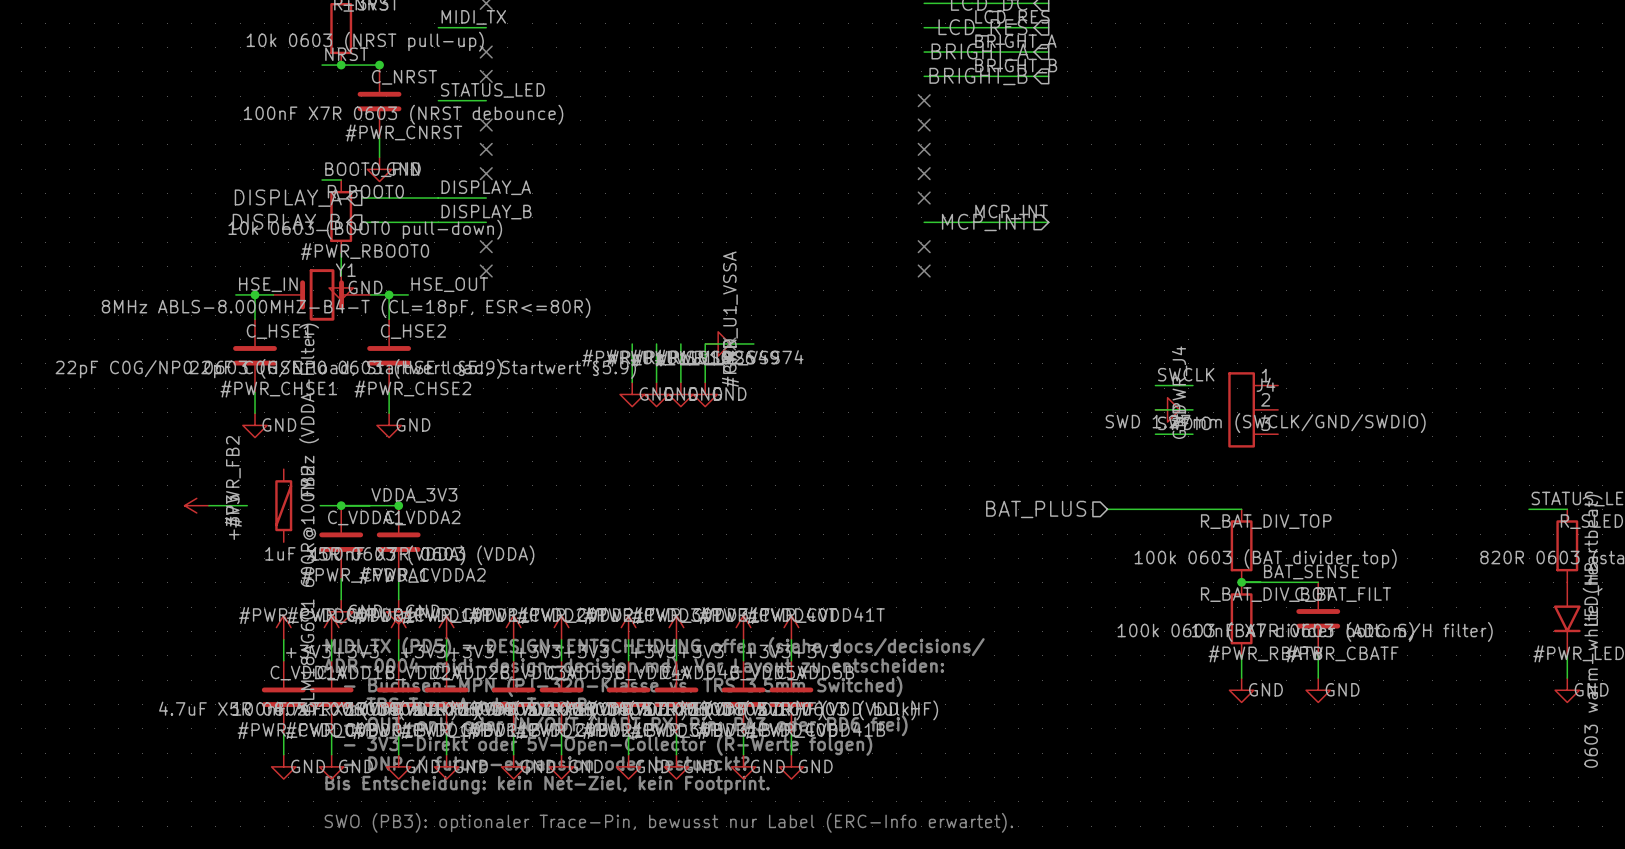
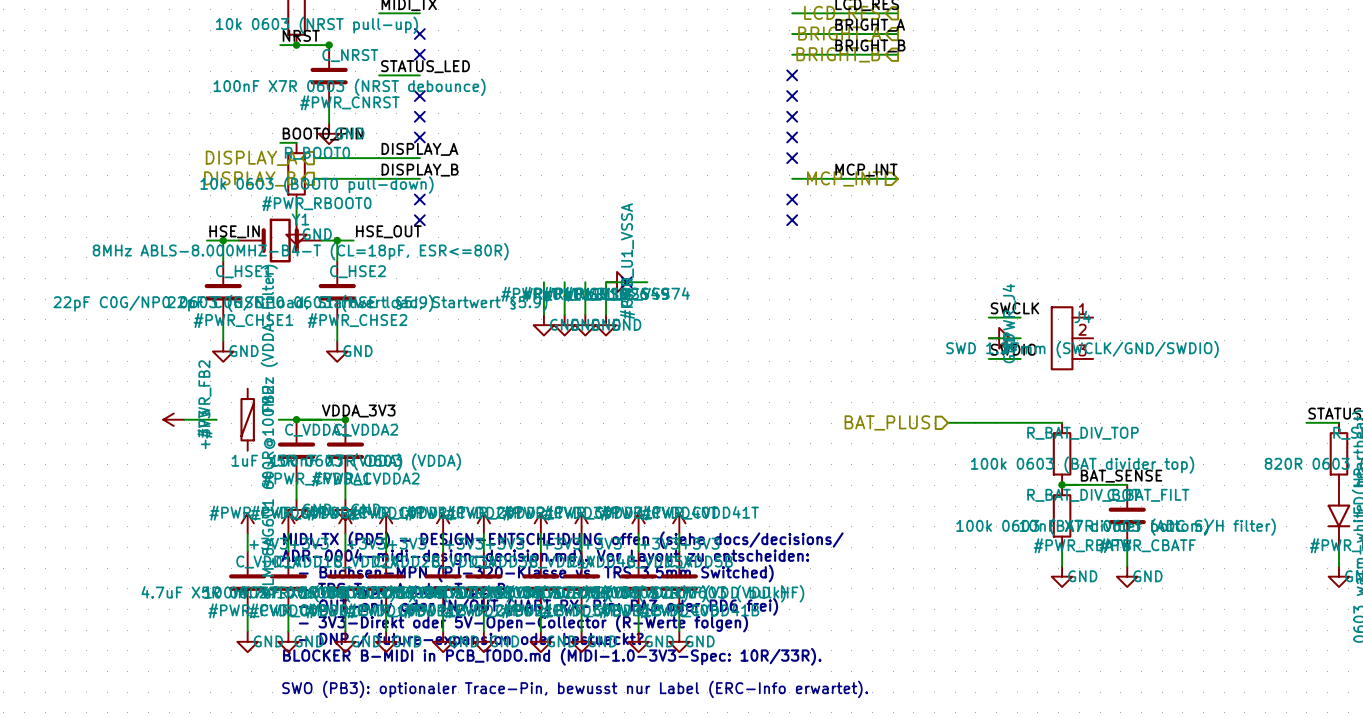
text: Bis Entscheidung: kein Net-Ziel, kein Footprint. (547, 785) -> BLOCKER B-MIDI in PCB_TODO.md (MIDI-1.0-3V3-Spec: 10R/33R). (552, 656)

